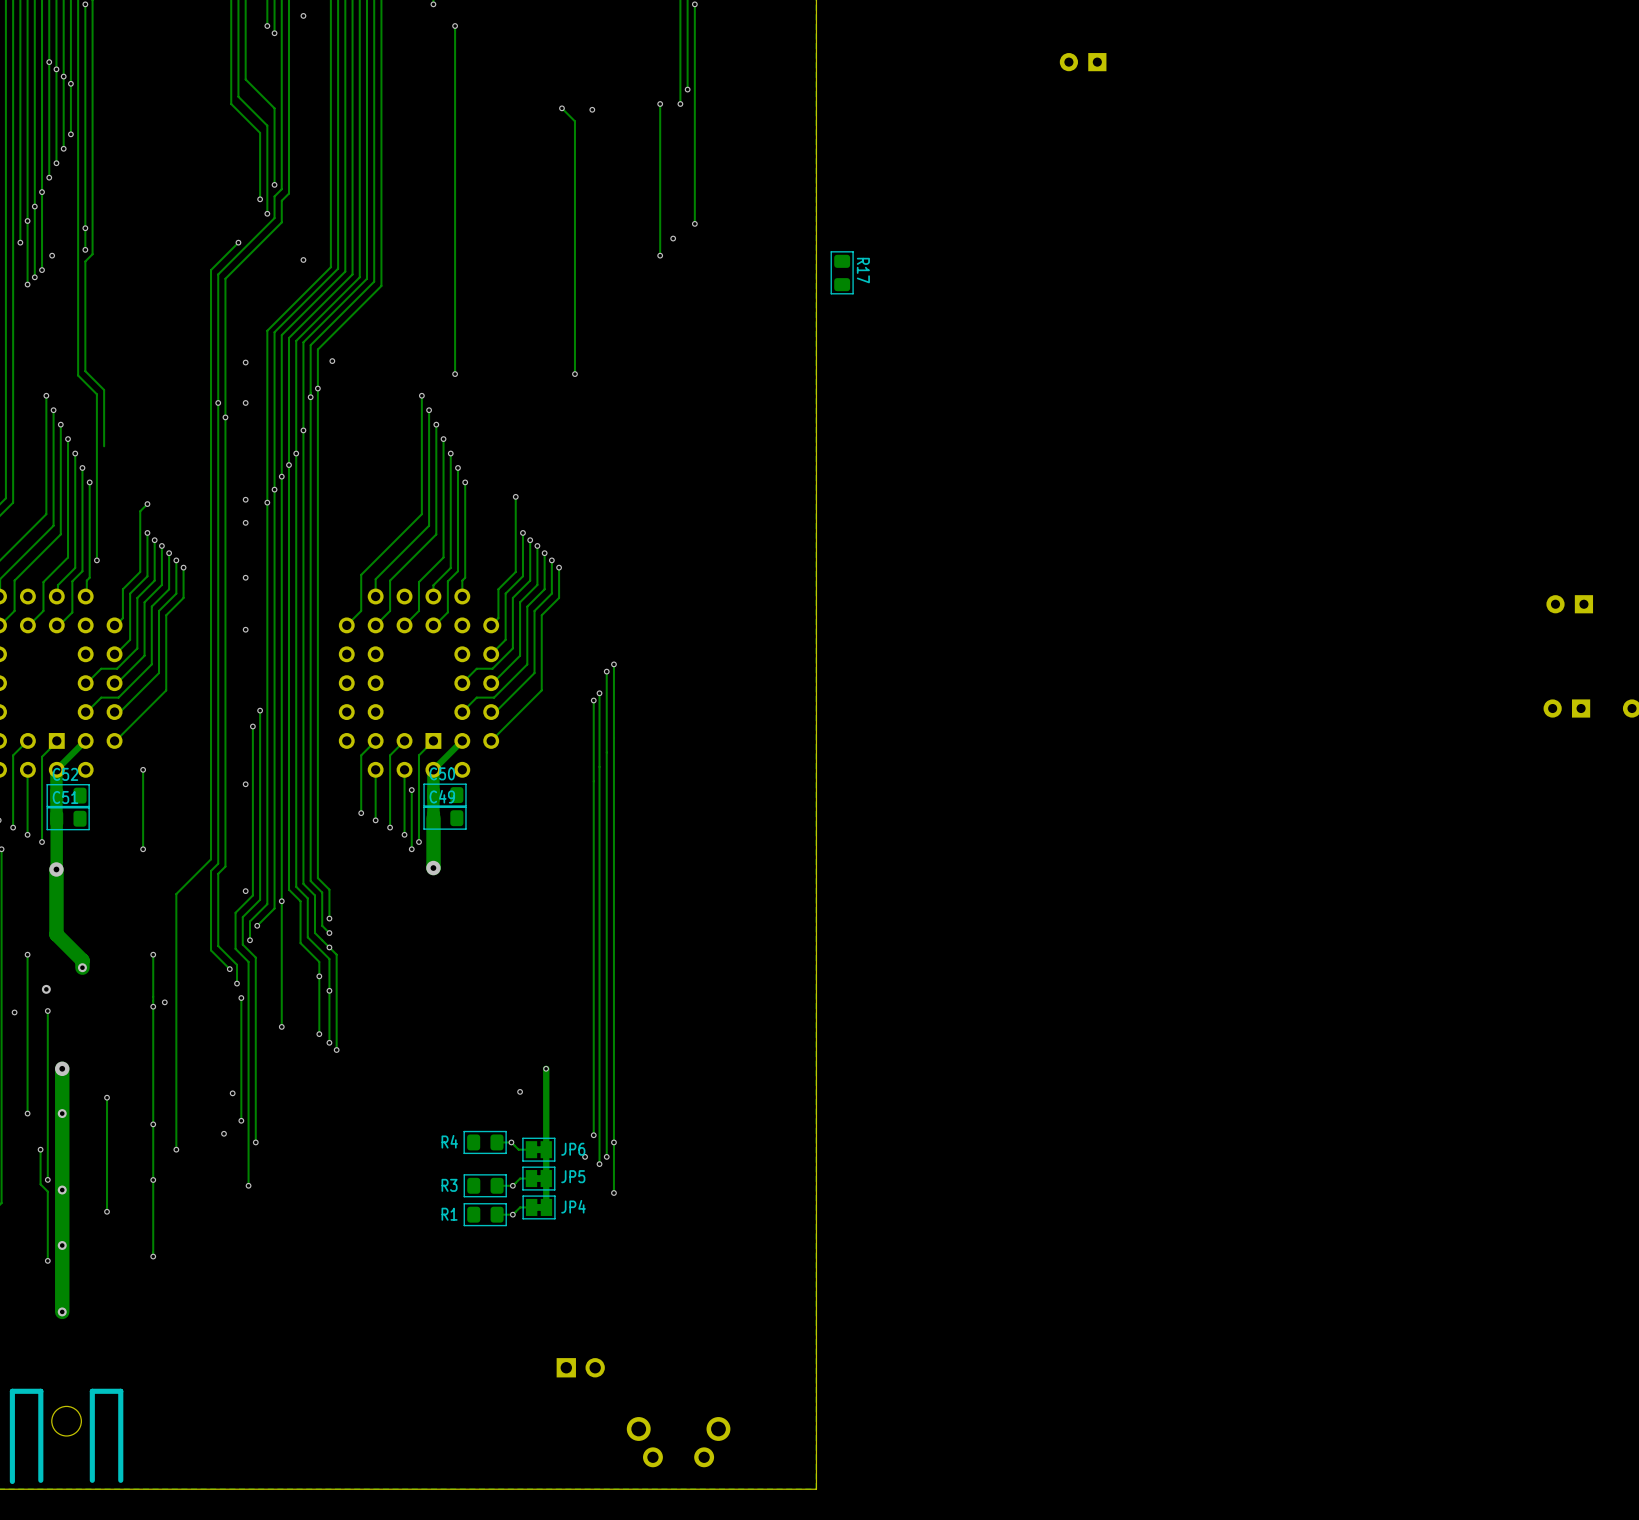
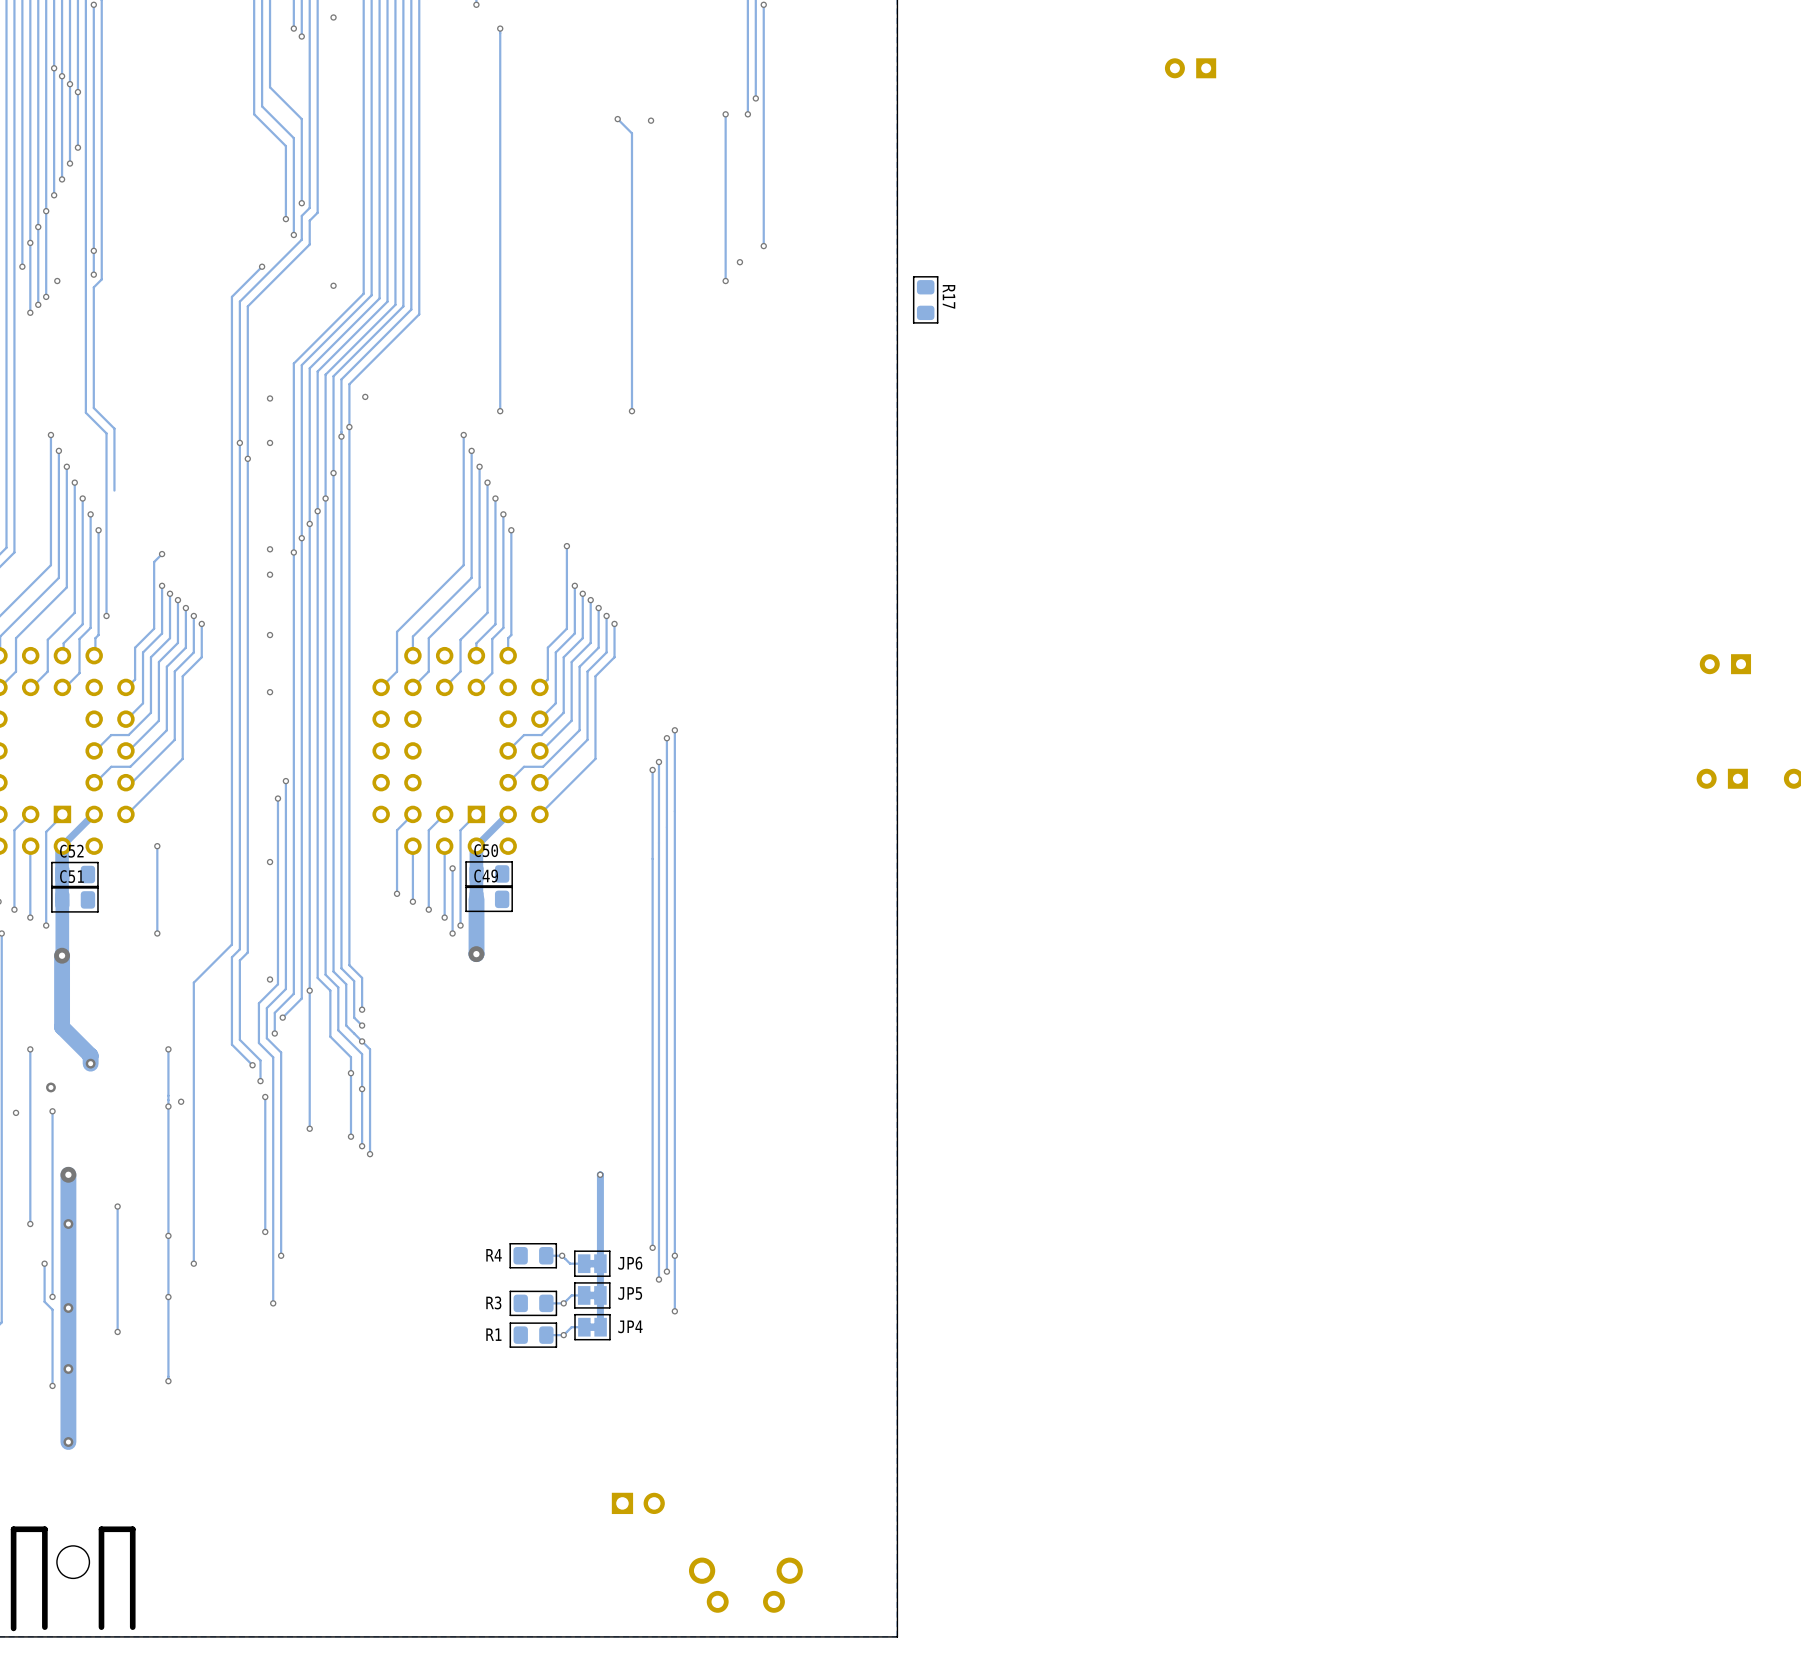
via: (520, 1091) -> none
via: (232, 1093) -> none
via: (224, 1133) -> none
via: (585, 1156) -> none

